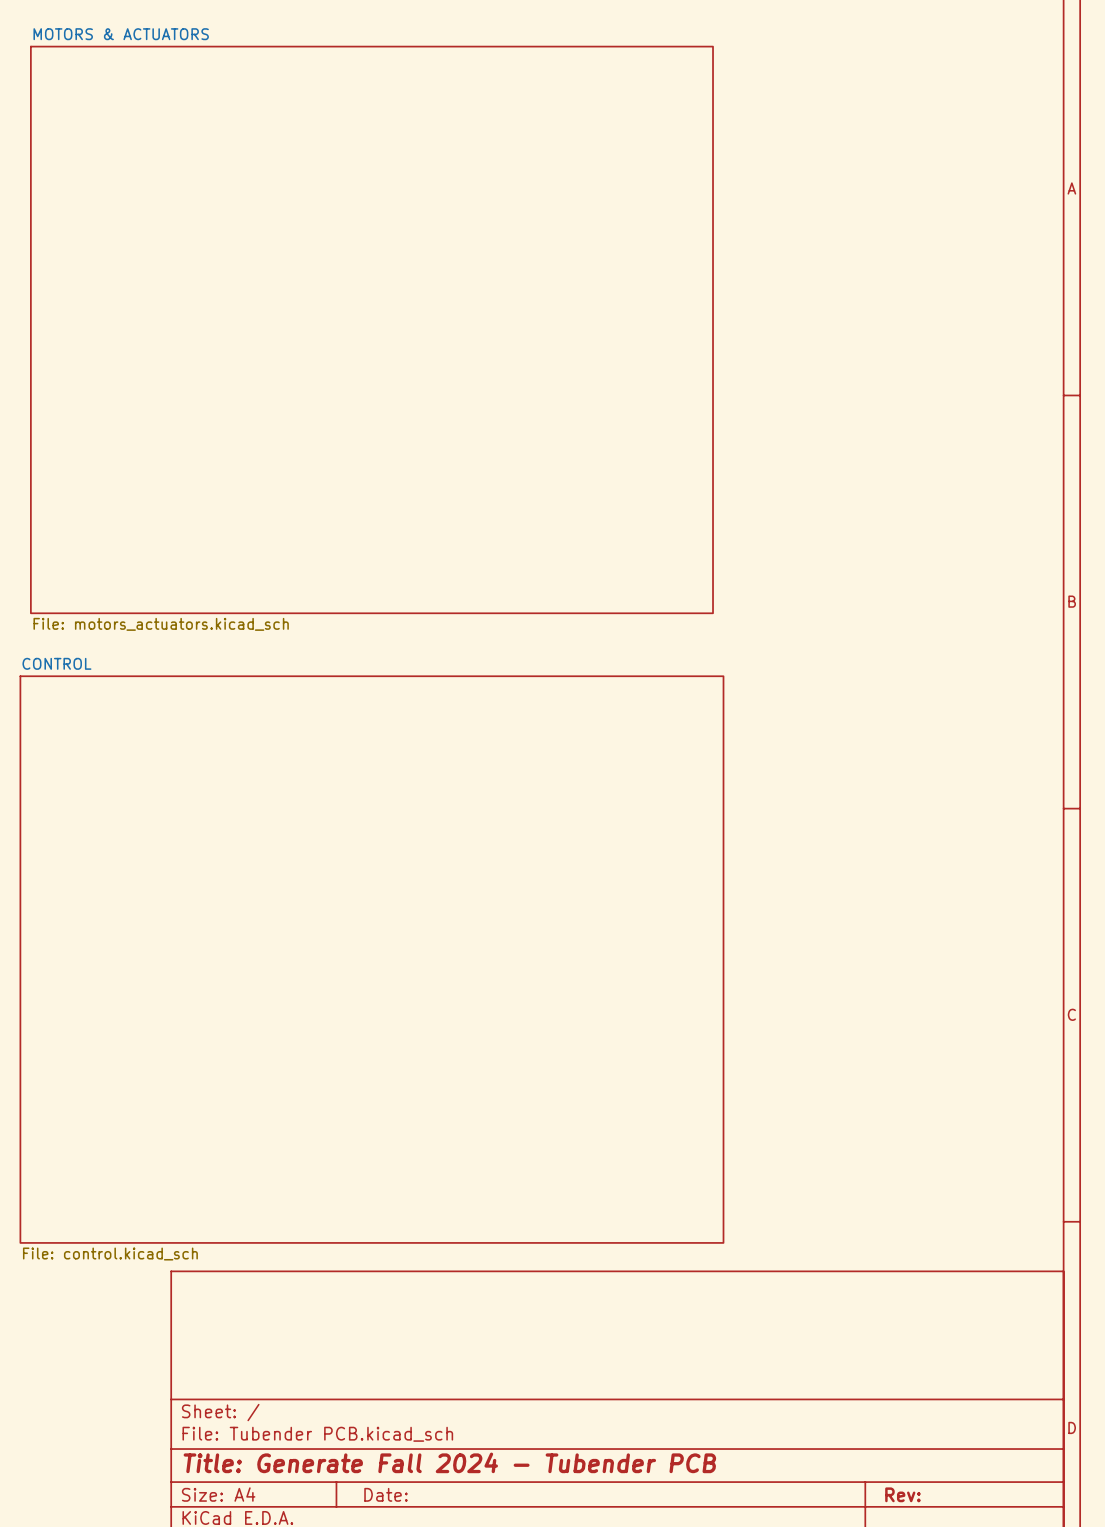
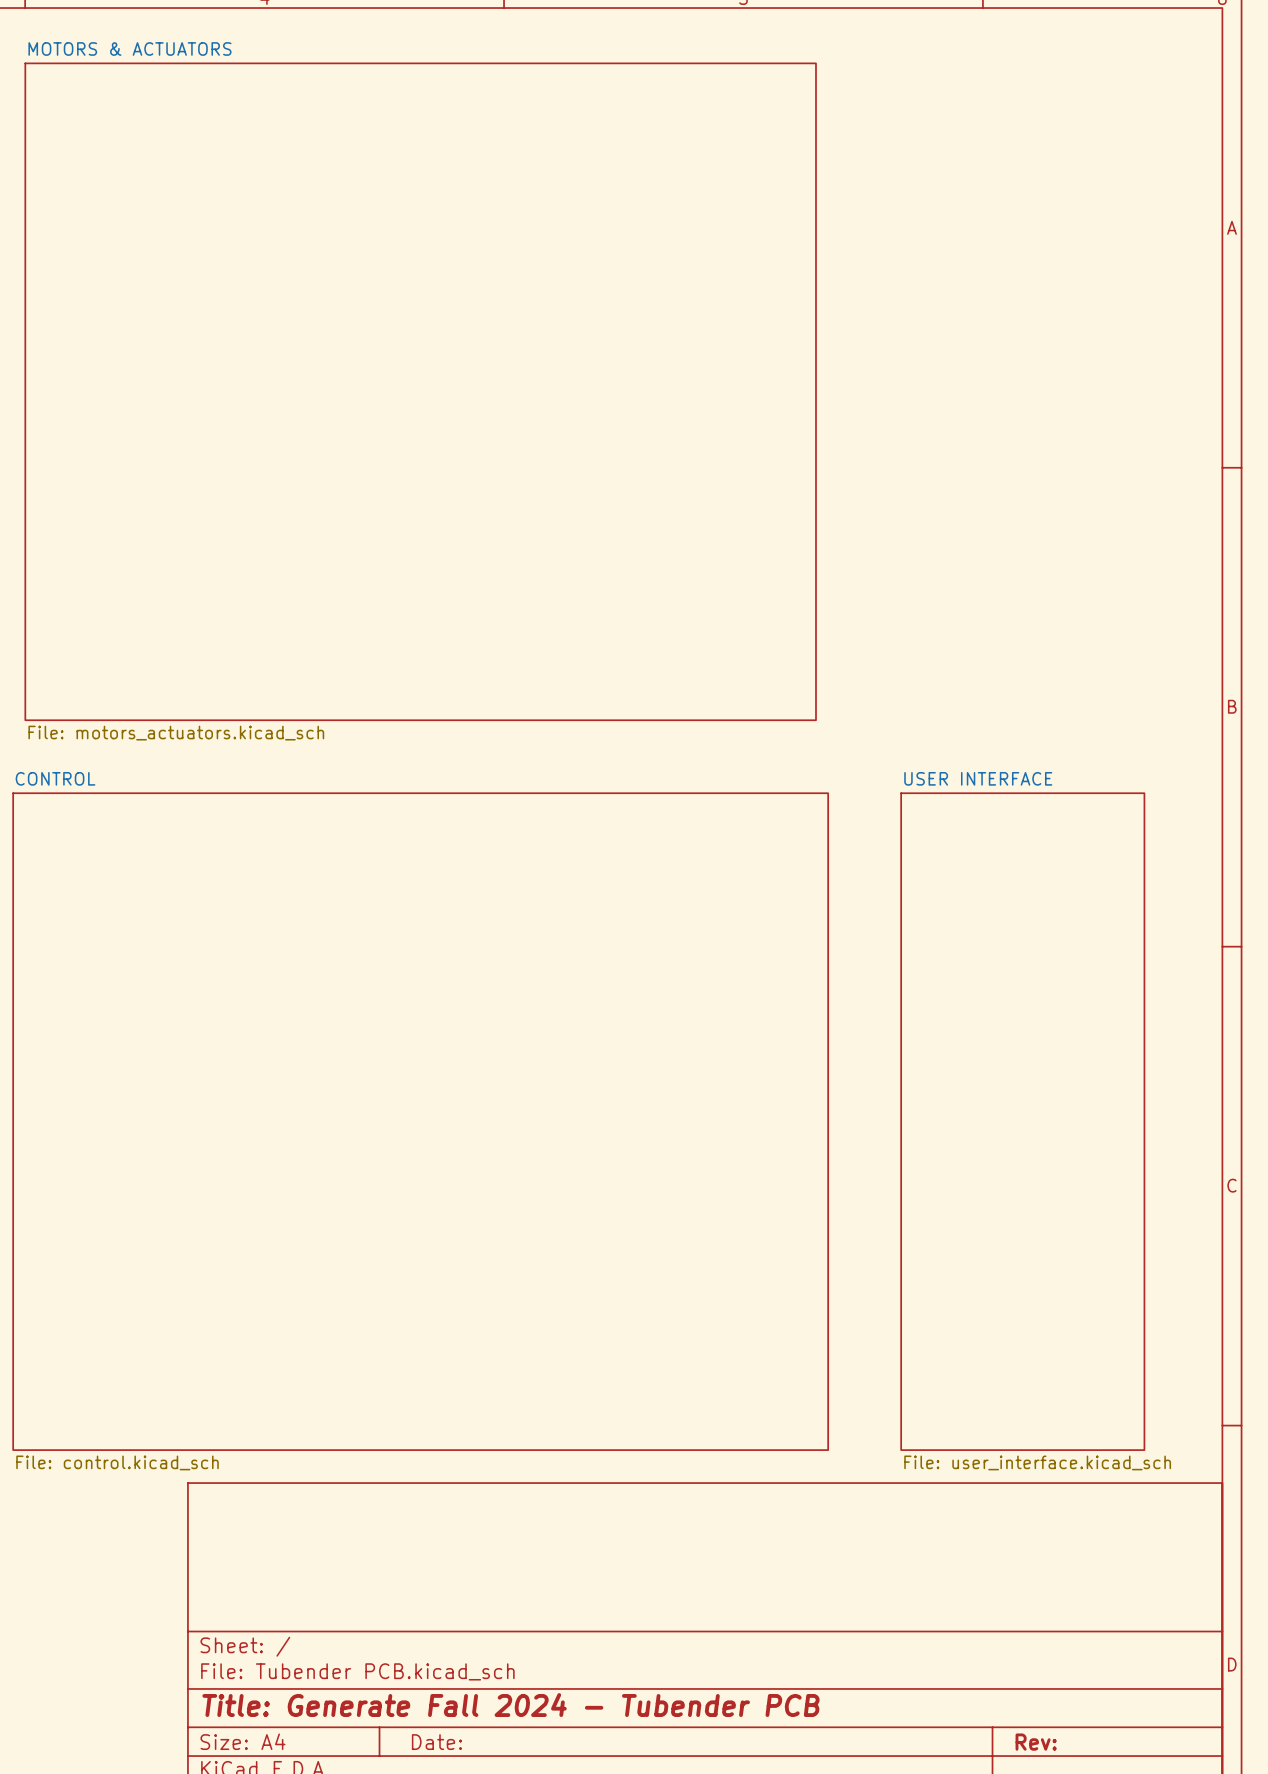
sheet USER INTERFACE: none -> File: user_interface.kicad_sch (1022, 1121)

